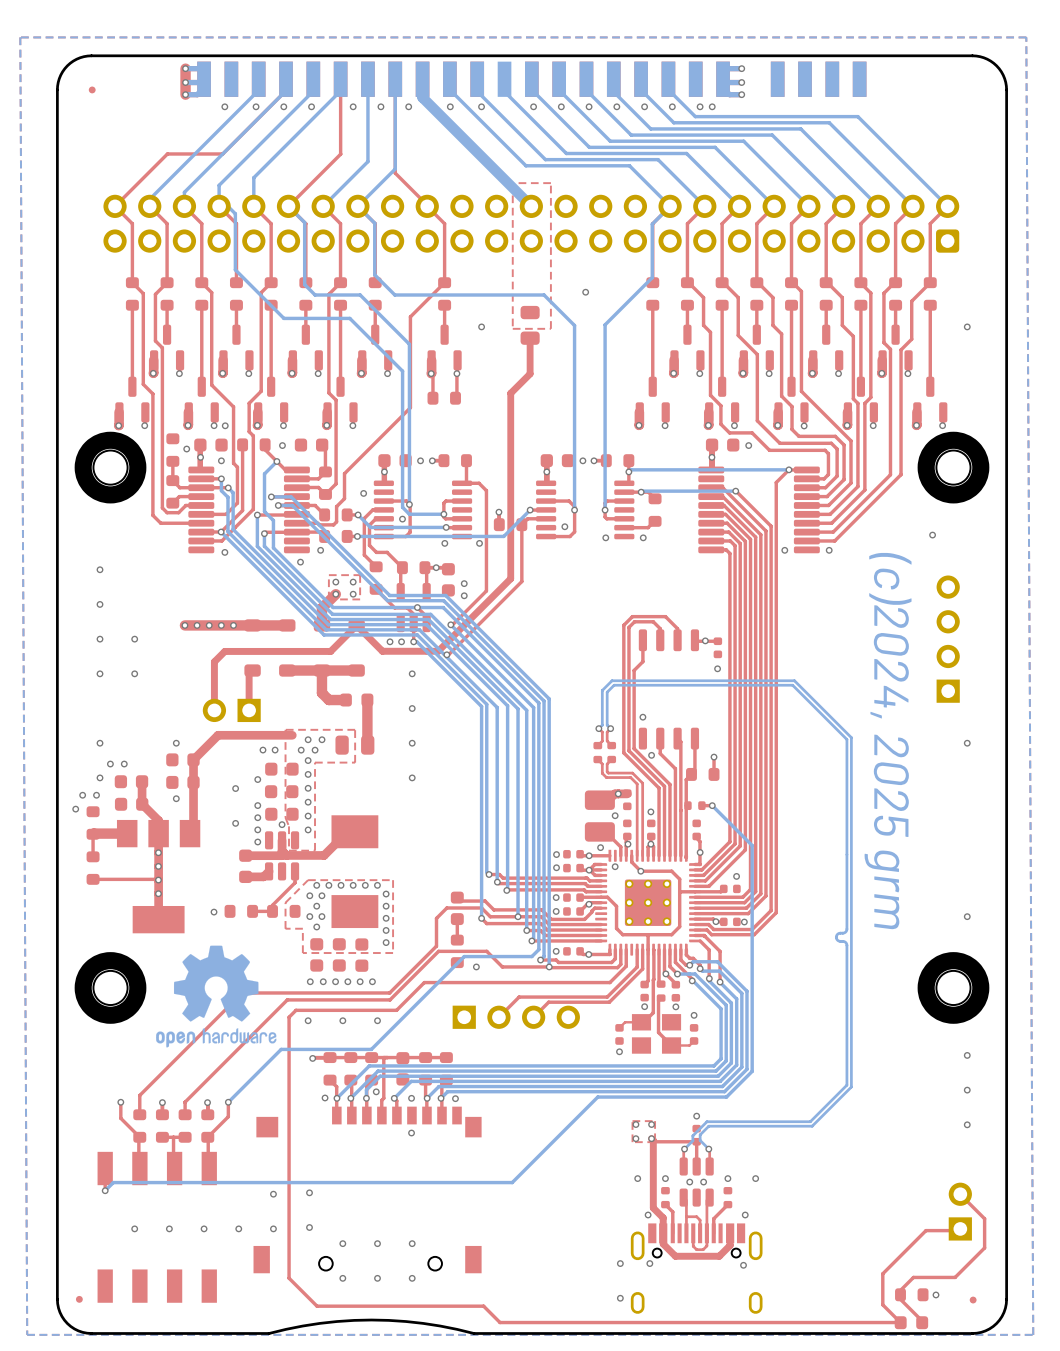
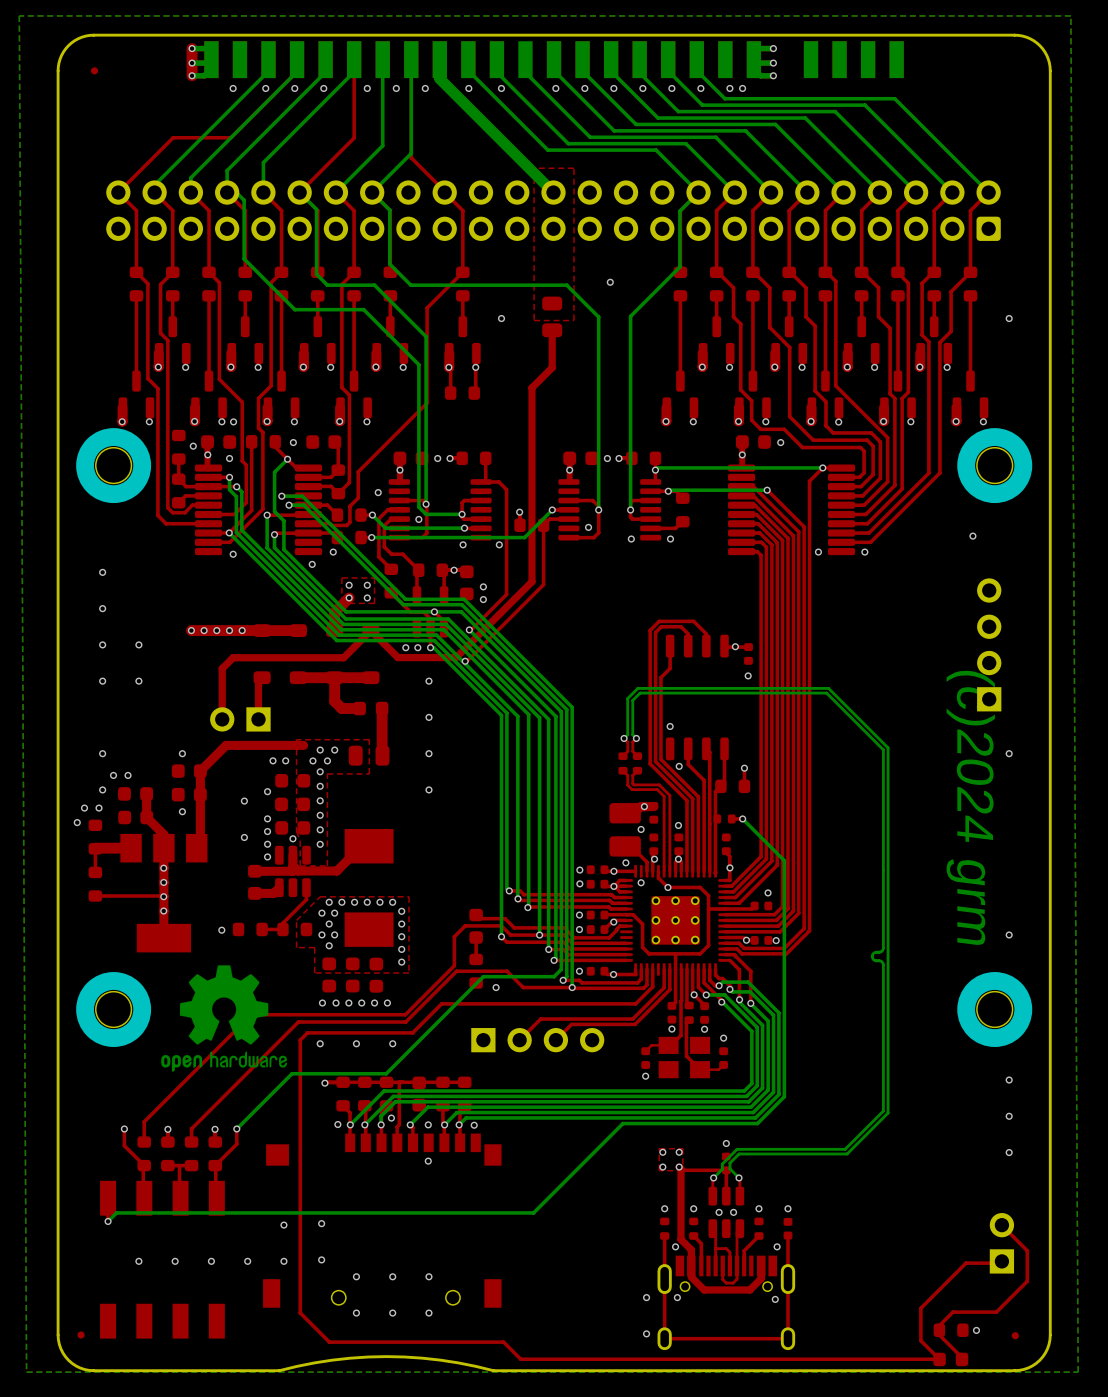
text: (c)2024, 2025 grm (888, 741) -> (c)2024 grm (970, 807)
part: none -> (664, 1228)
part: none -> (787, 1228)
top track: none -> (788, 1235) (788, 1338) (664, 1338) (664, 1236)

